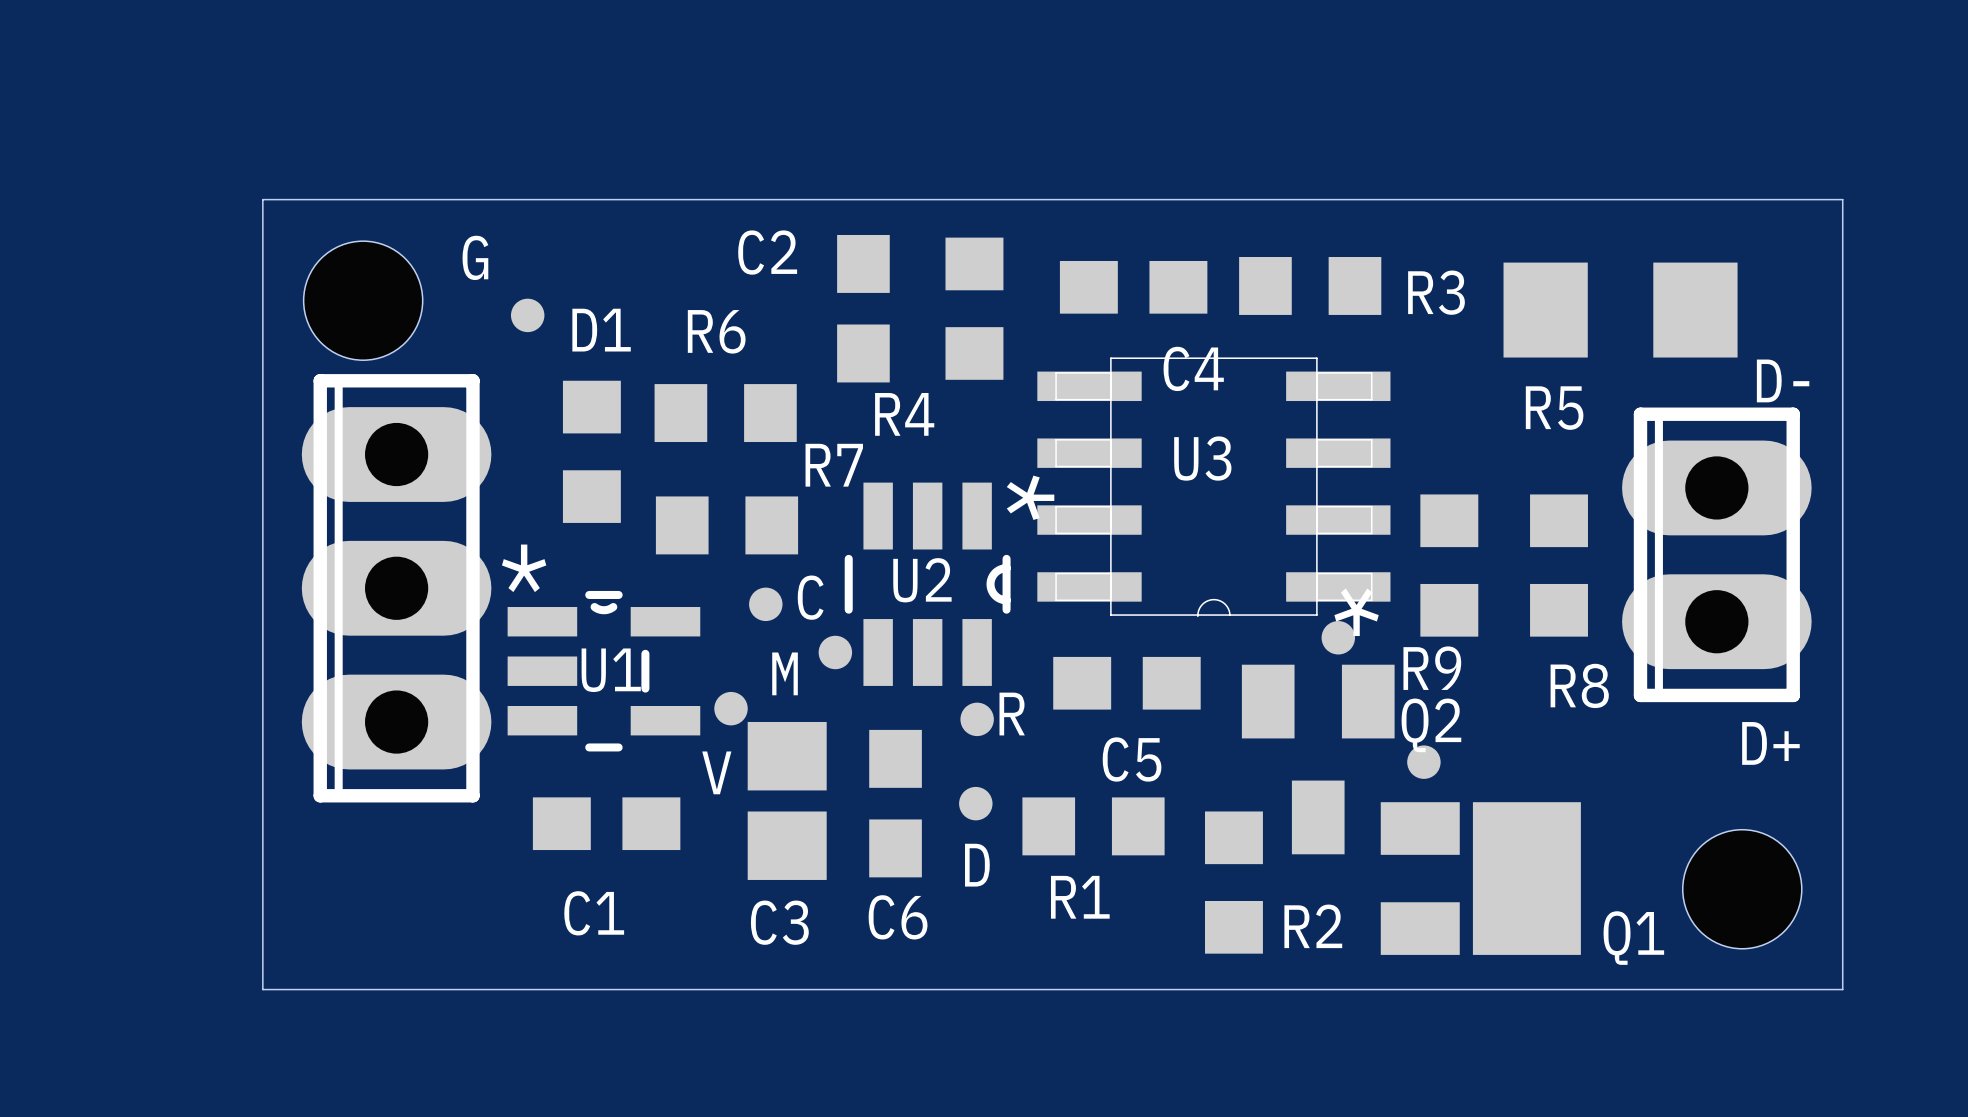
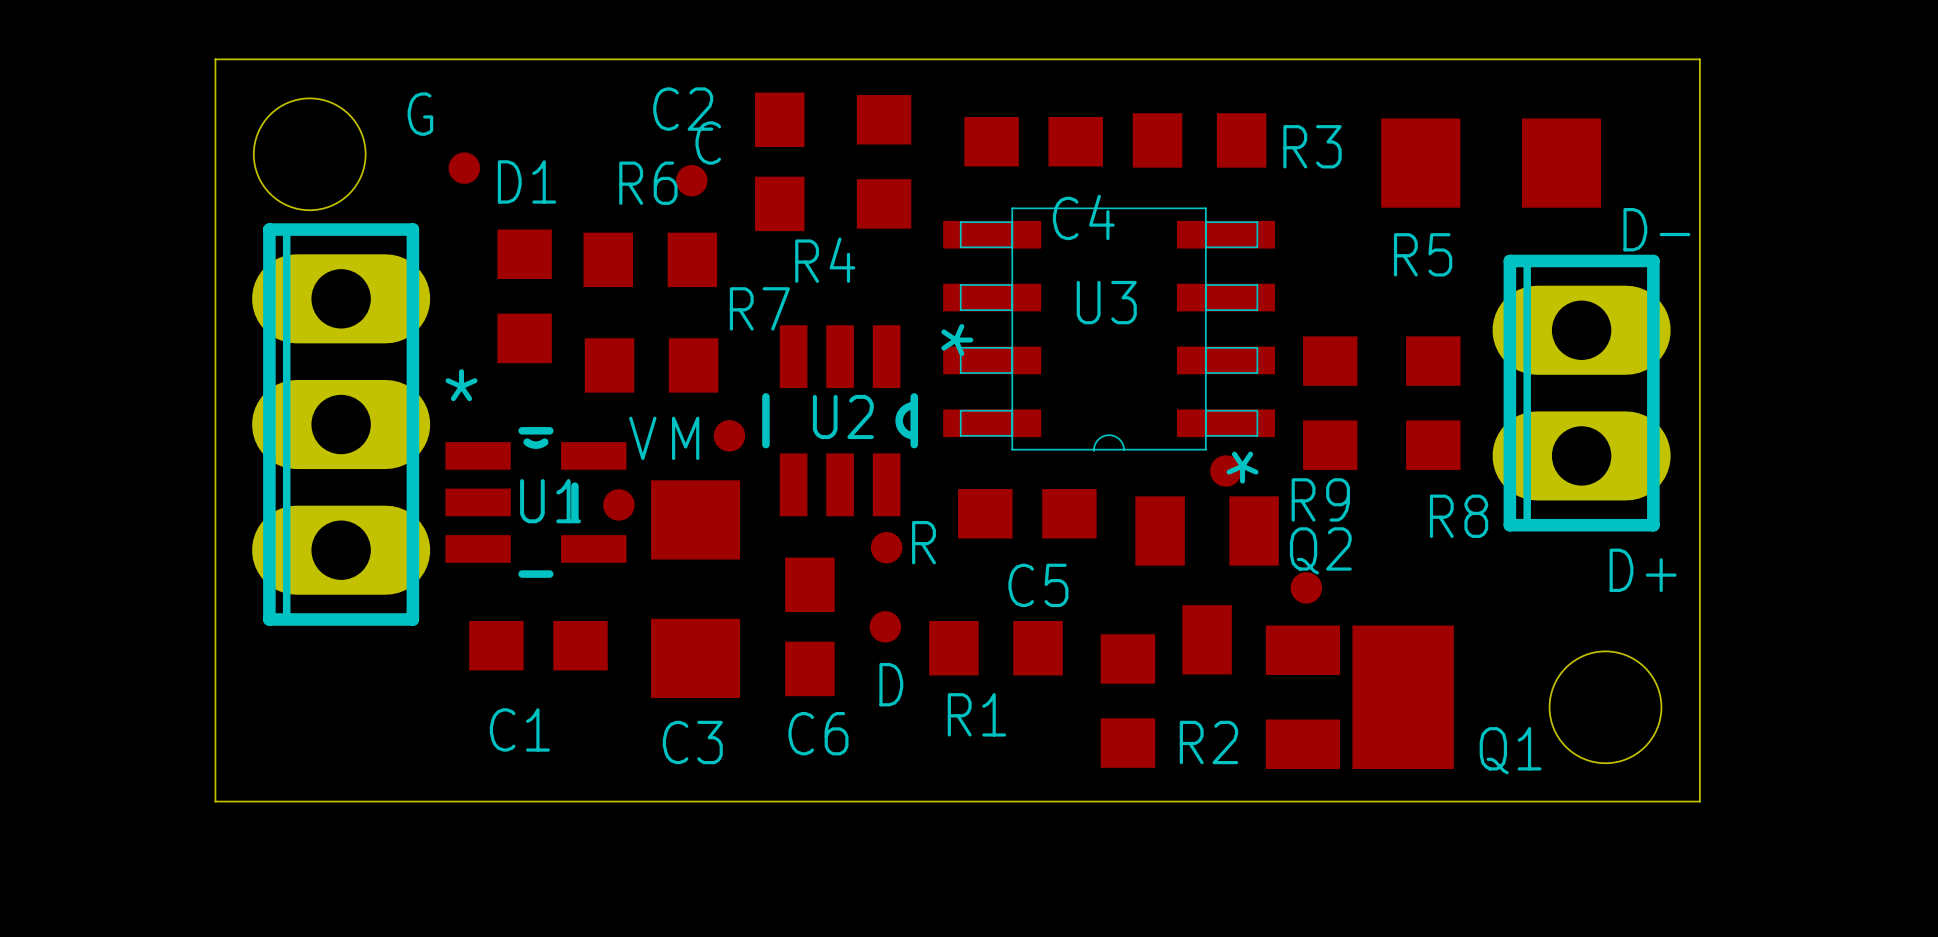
part: none -> (691, 180)
text position: C (810, 597) -> C (708, 142)
part: none -> (729, 435)
part: (765, 604) -> none
part: (835, 652) -> none
part: none -> (618, 504)
text position: M (785, 673) -> M (685, 438)
part: (731, 708) -> none
C3 footprint: [747, 721, 827, 880] -> [651, 480, 741, 699]
text position: V (716, 772) -> V (642, 438)

